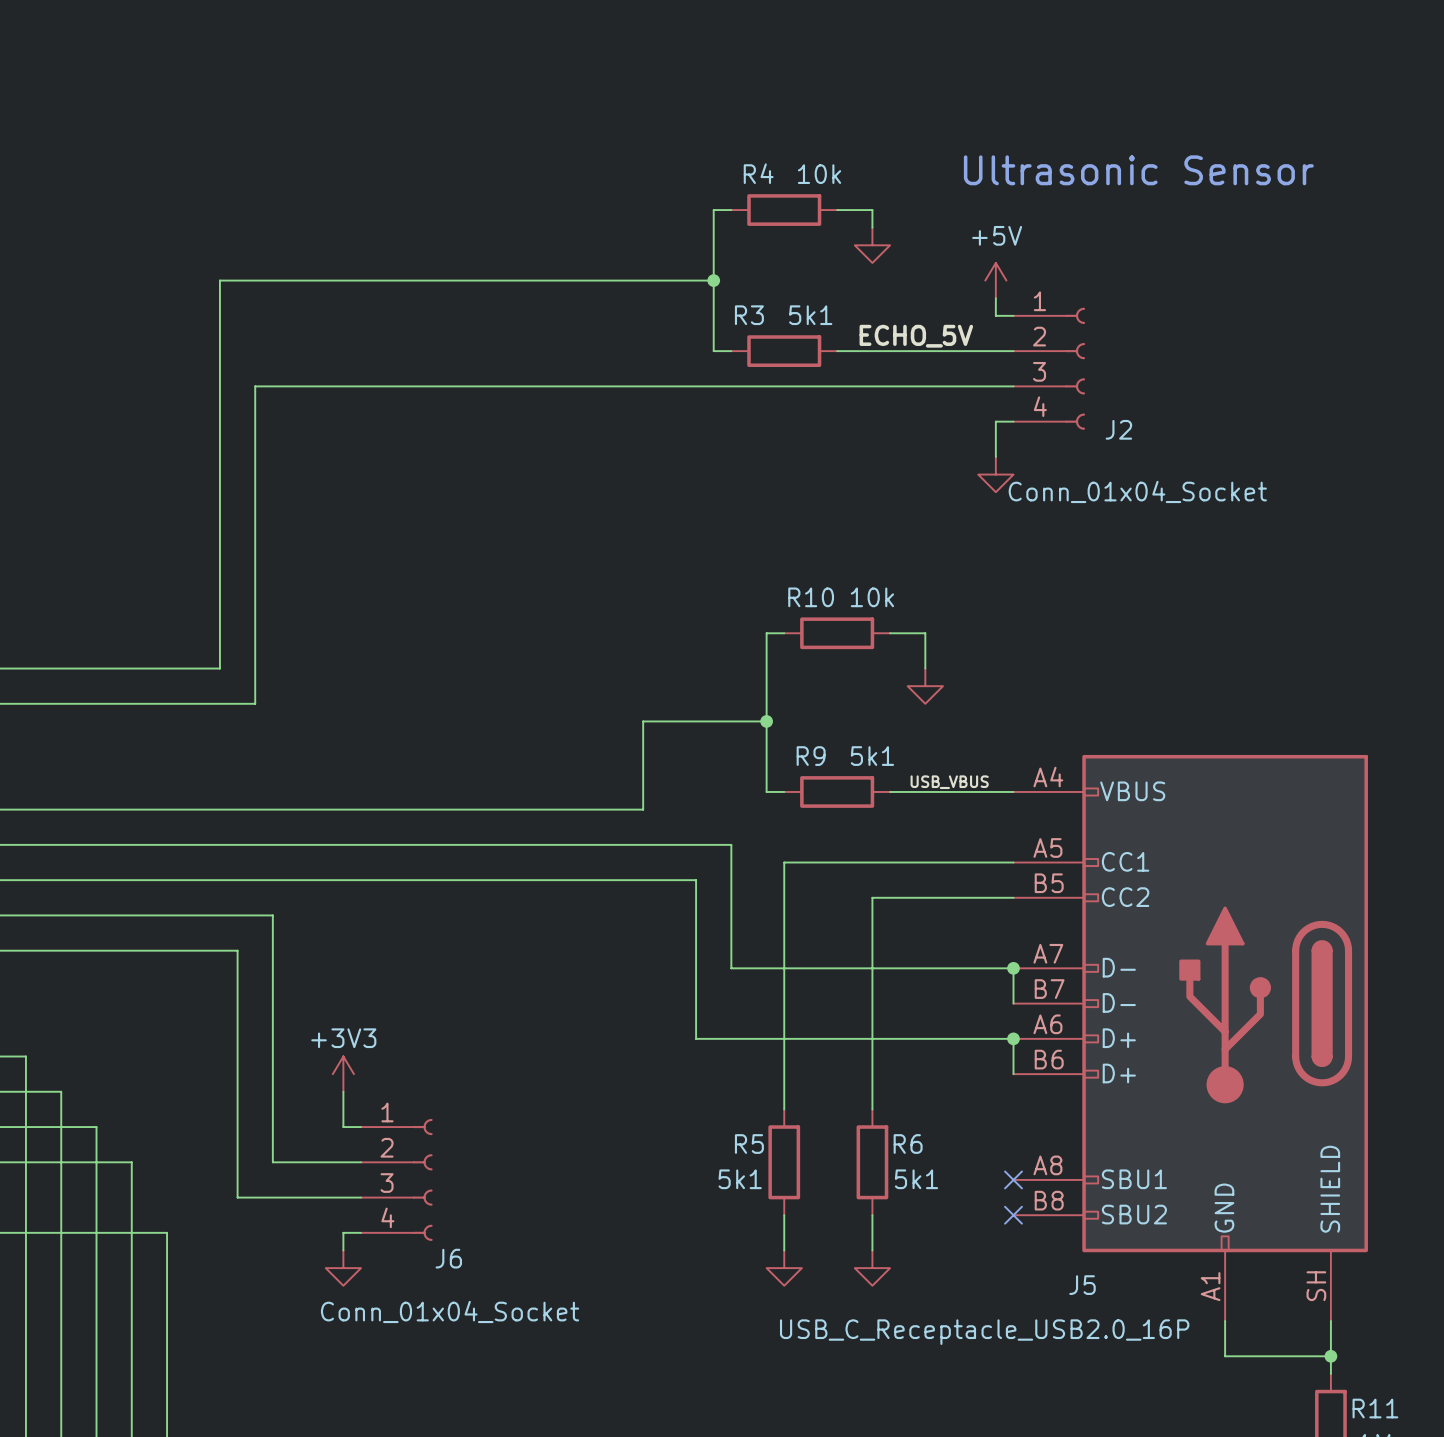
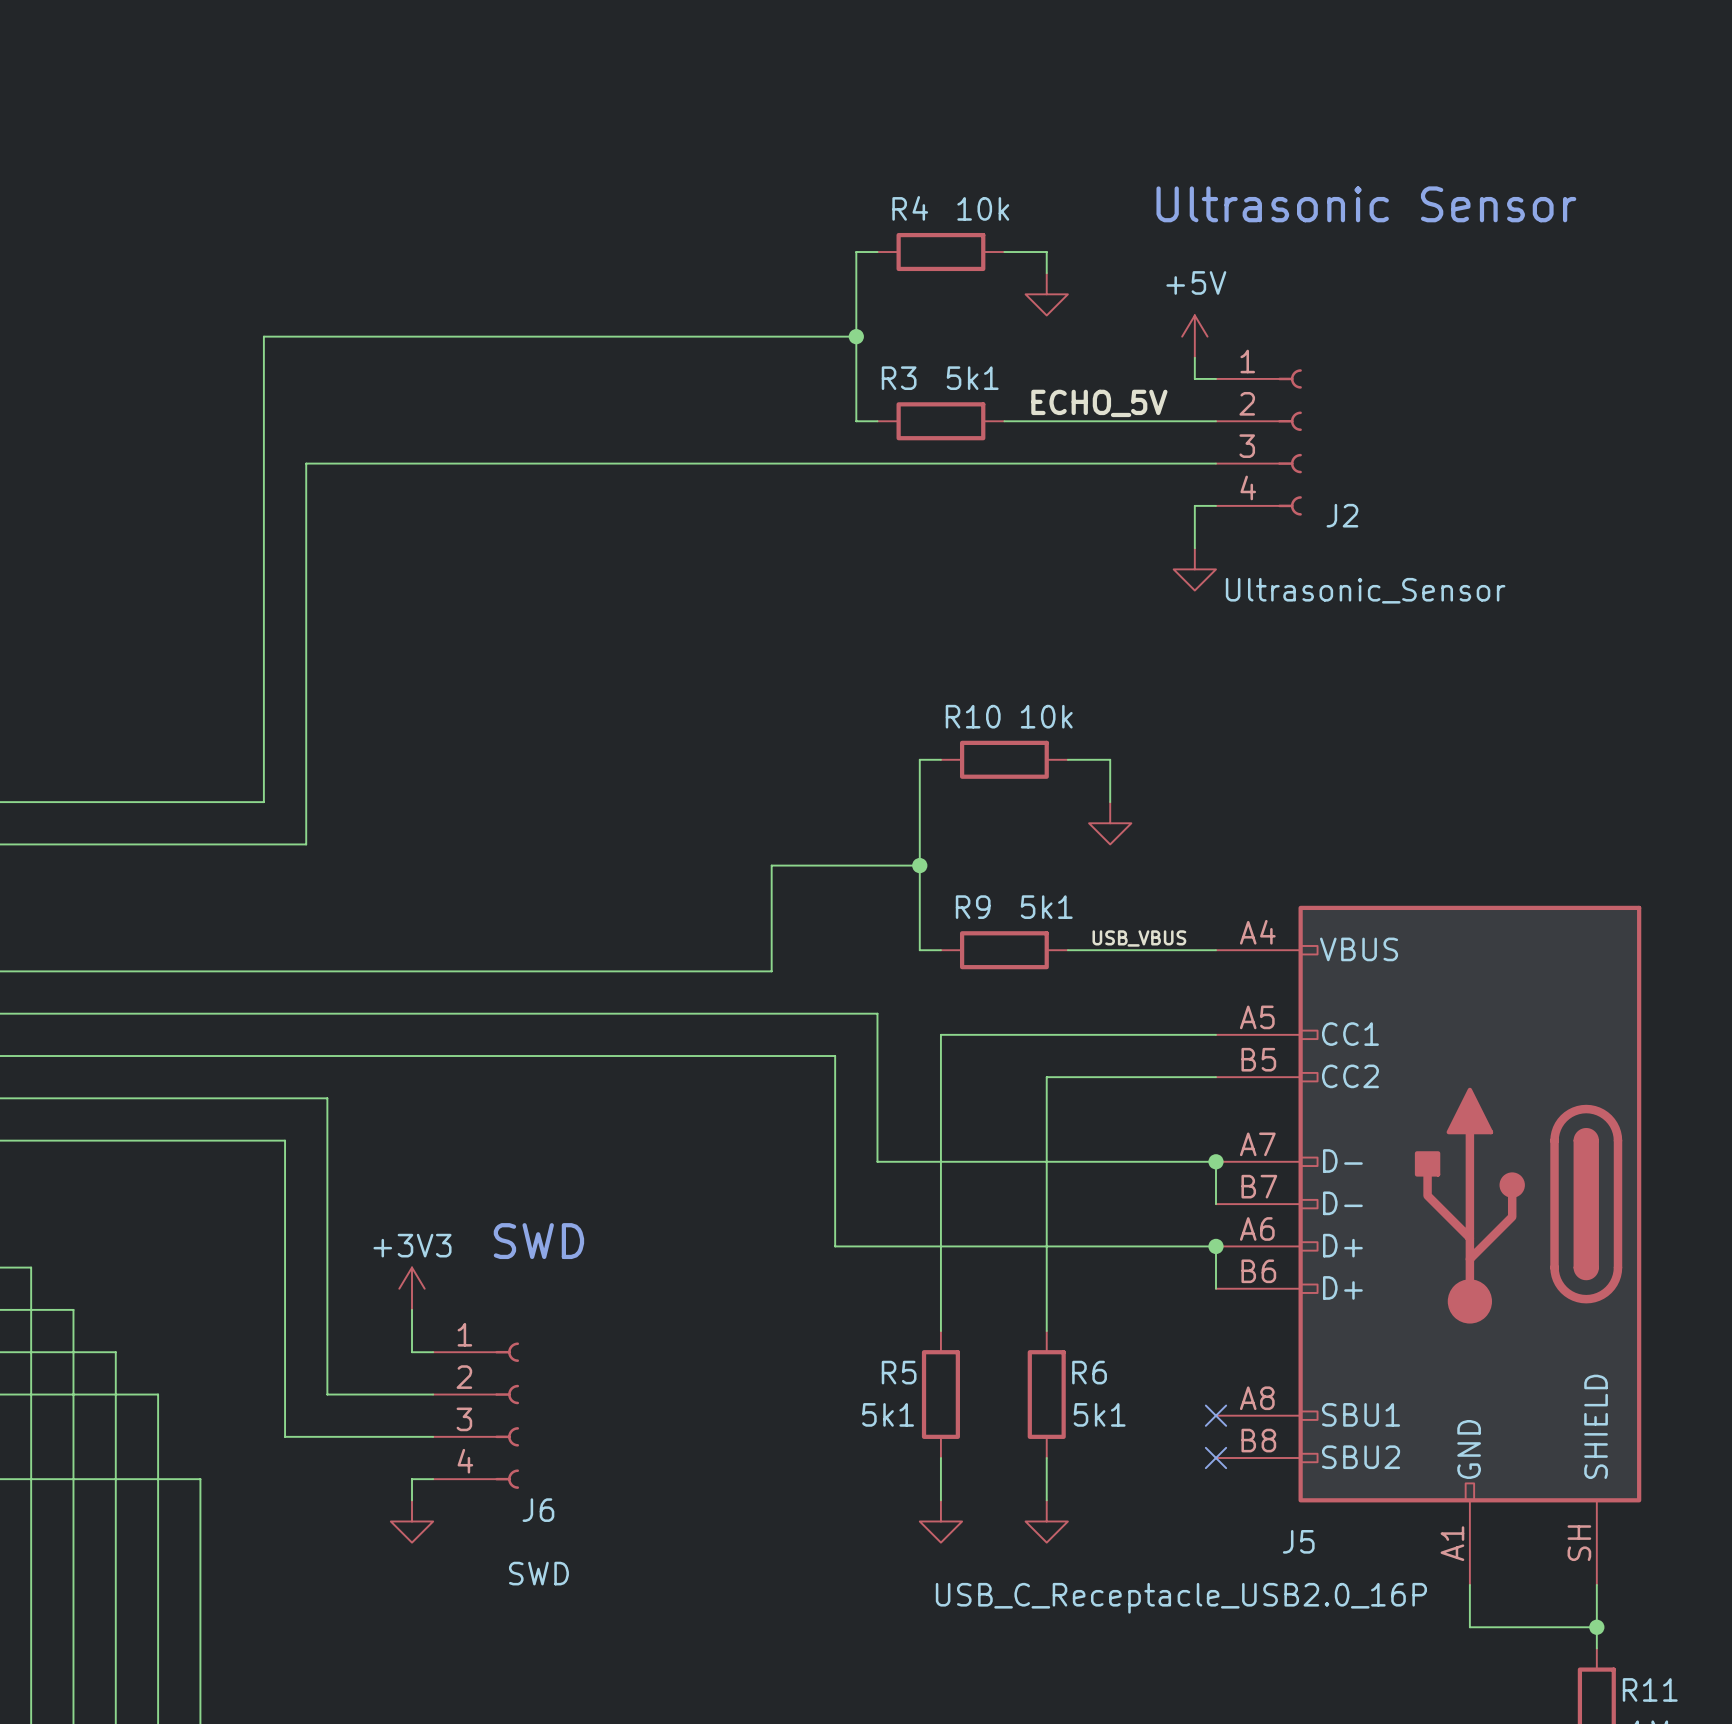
J2 value: Conn_01x04_Socket (1137, 491) -> Ultrasonic_Sensor (1365, 590)
text: none -> SWD (538, 1241)
J6 value: Conn_01x04_Socket (450, 1311) -> SWD (538, 1573)

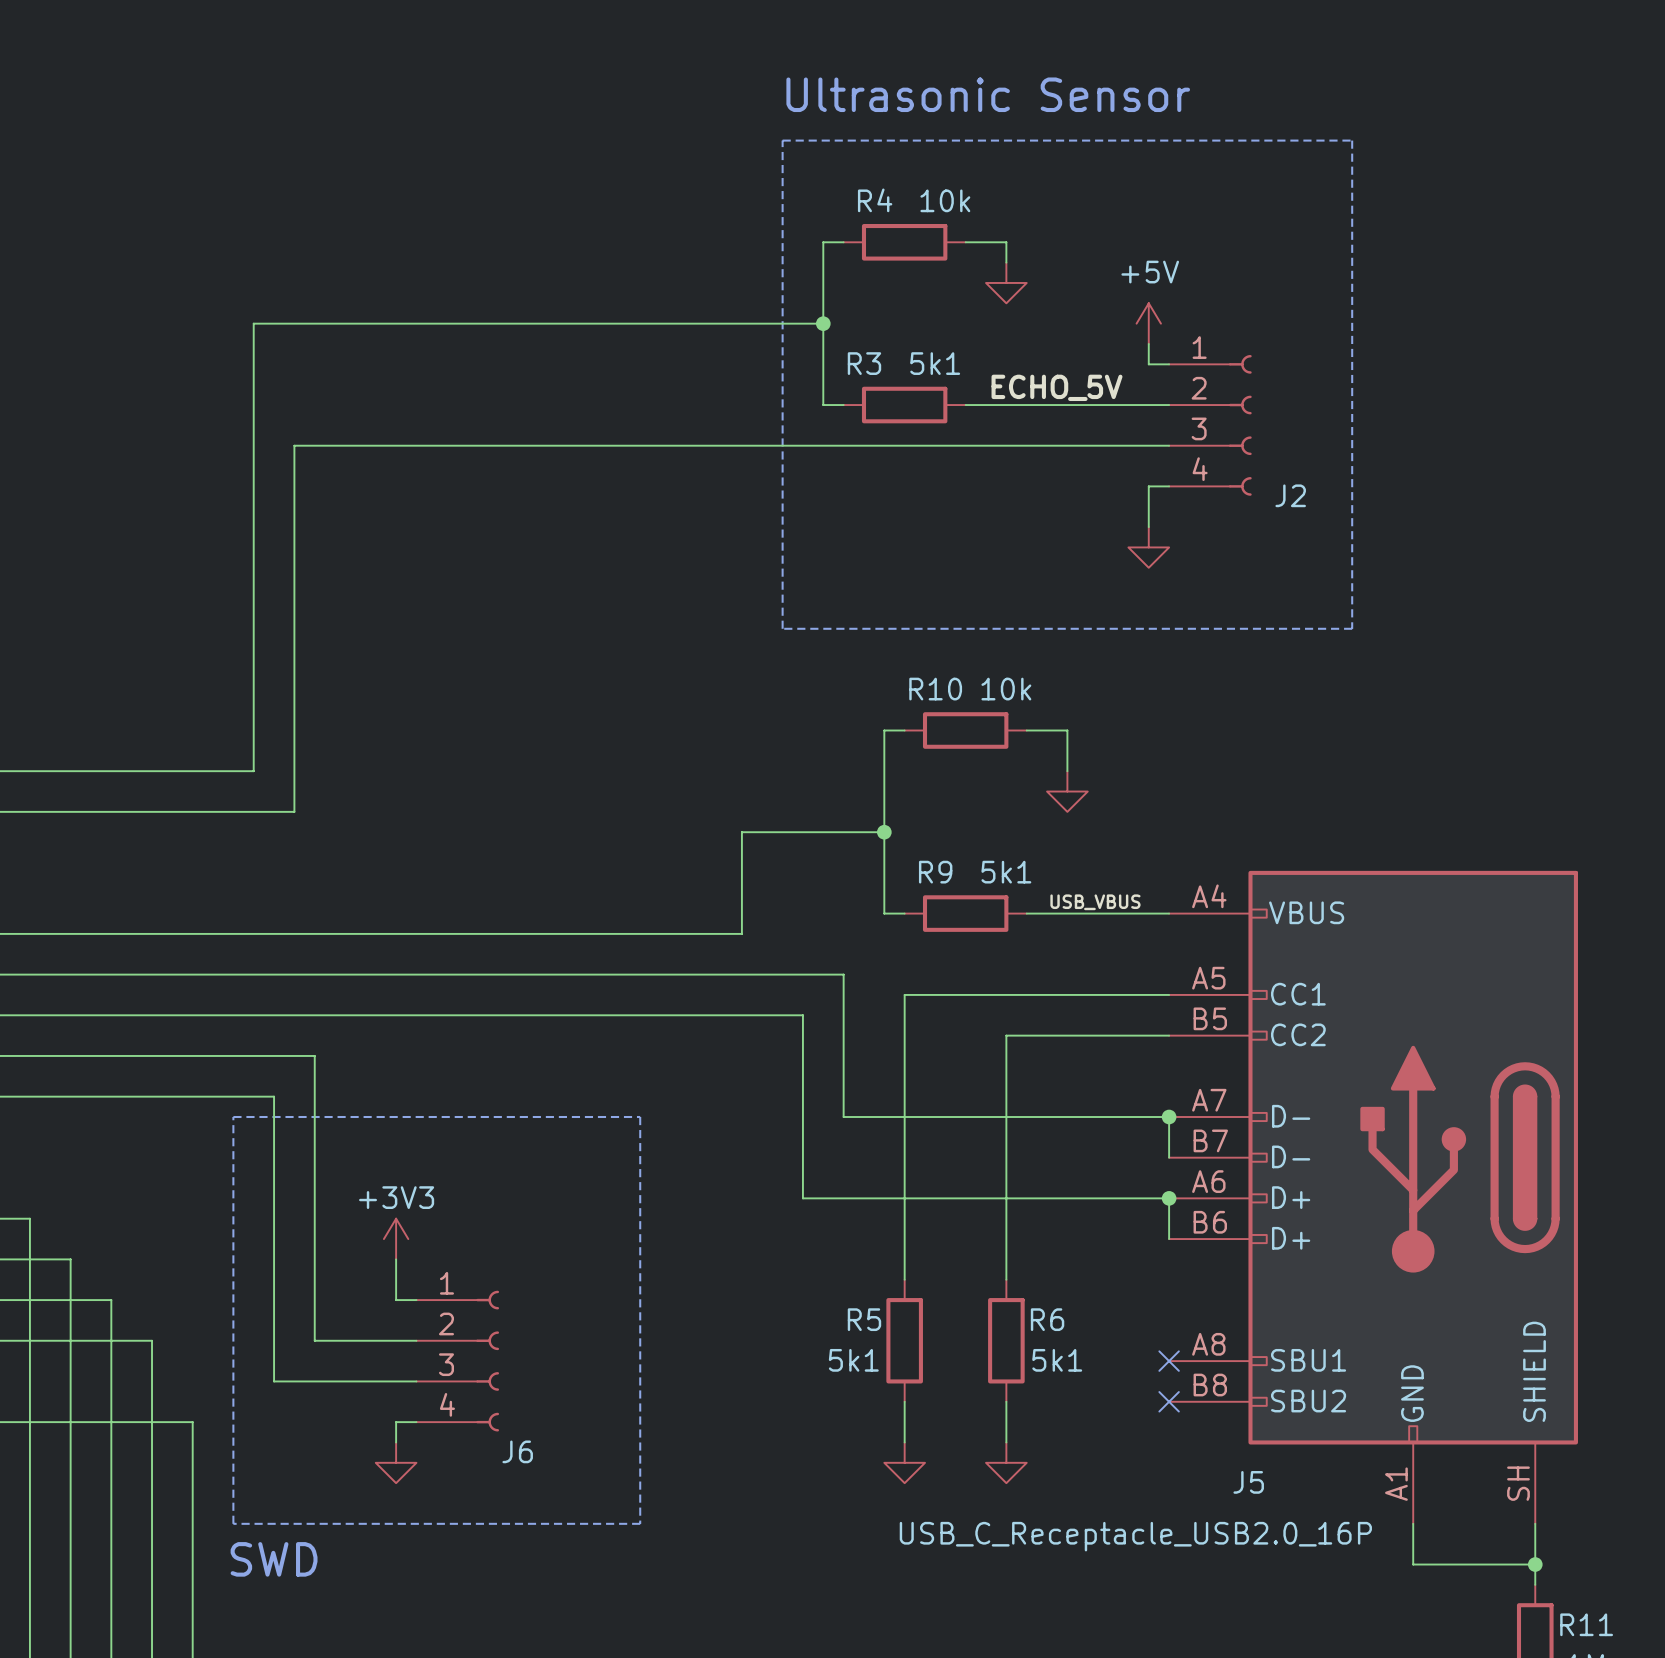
line: none -> (782, 140) (1352, 140) (1352, 628) (782, 628) (782, 140)
text position: Ultrasonic Sensor (1366, 204) -> Ultrasonic Sensor (988, 94)
J2 value: Ultrasonic_Sensor (1365, 590) -> none
line: none -> (233, 1117) (640, 1117) (640, 1523) (233, 1523) (233, 1117)
text: SWD (538, 1241) -> none
J6 value: SWD (538, 1573) -> none
text: none -> SWD (274, 1559)

